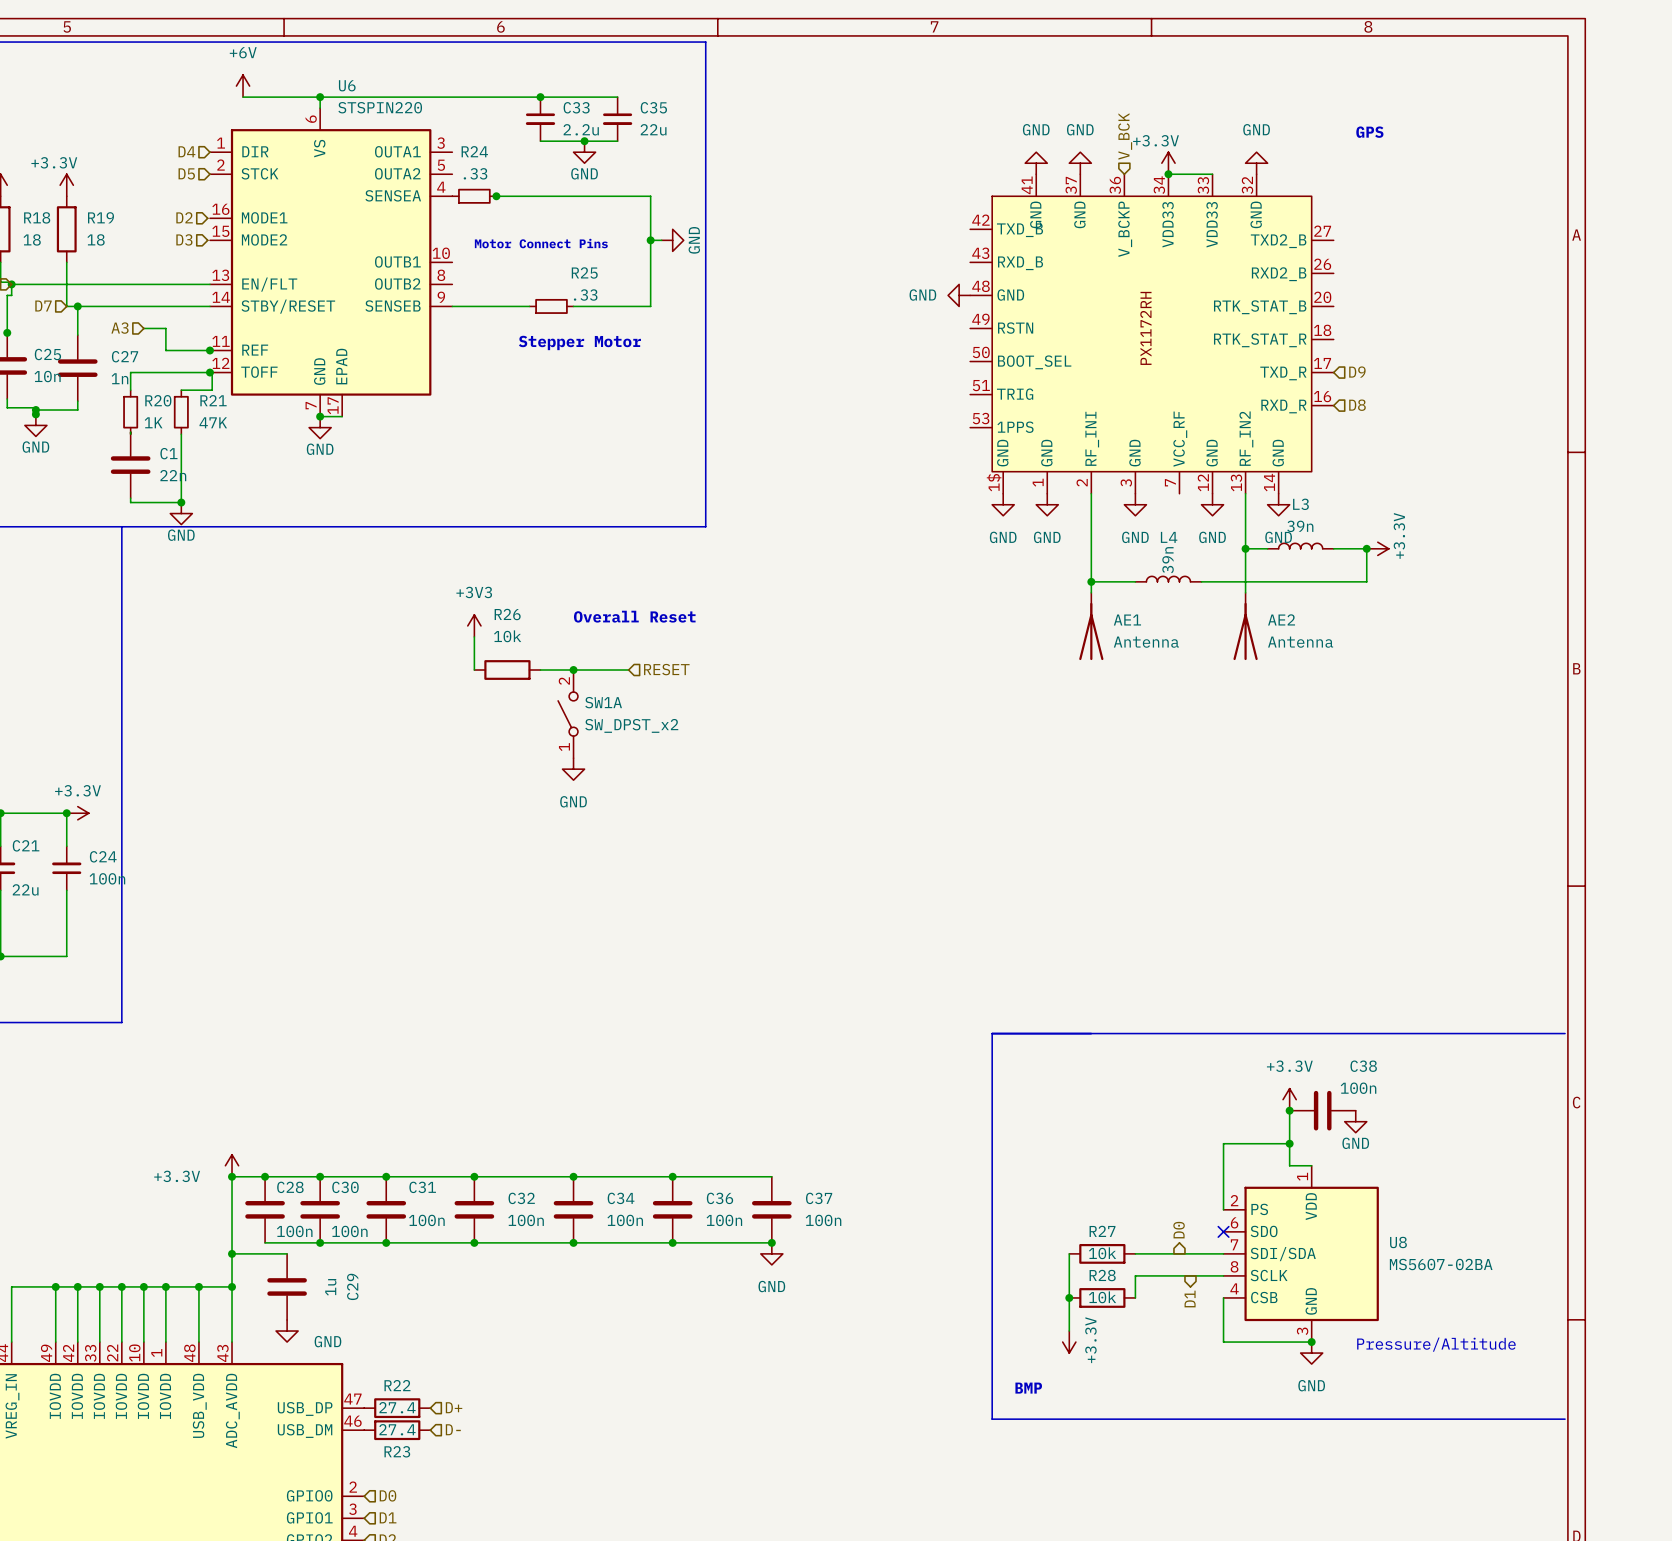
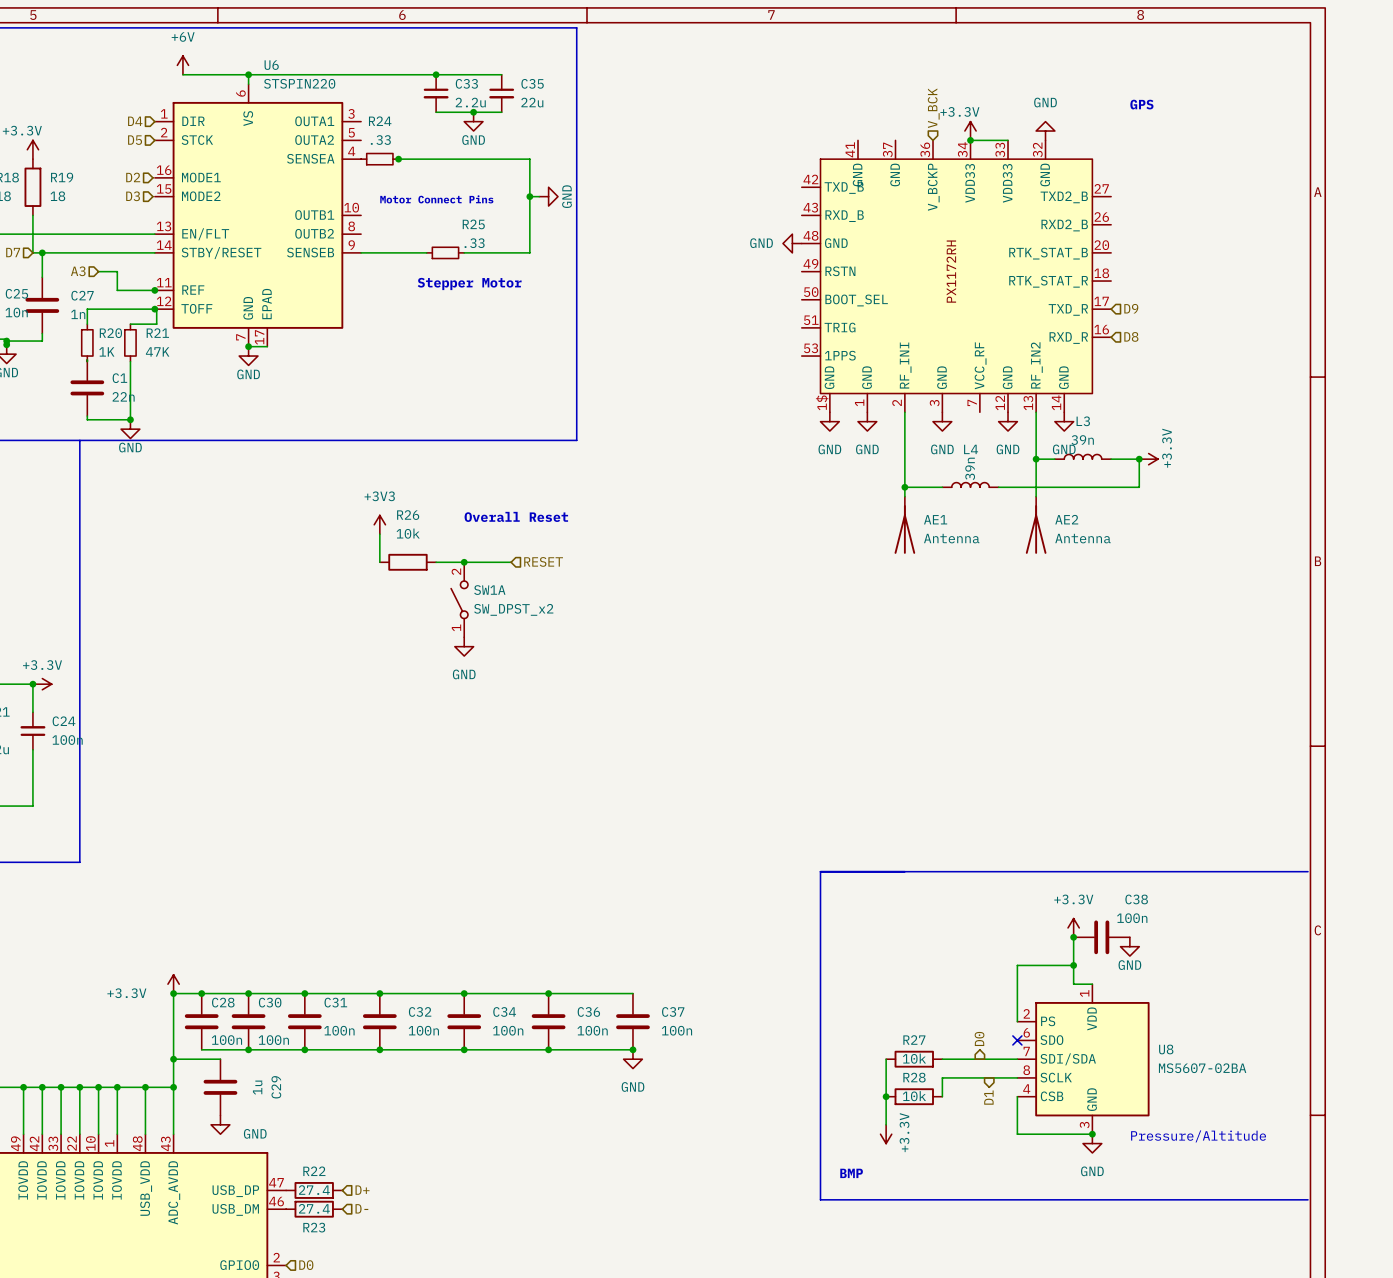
power symbol: GND (1036, 163) -> none
power symbol: GND (1080, 163) -> none

